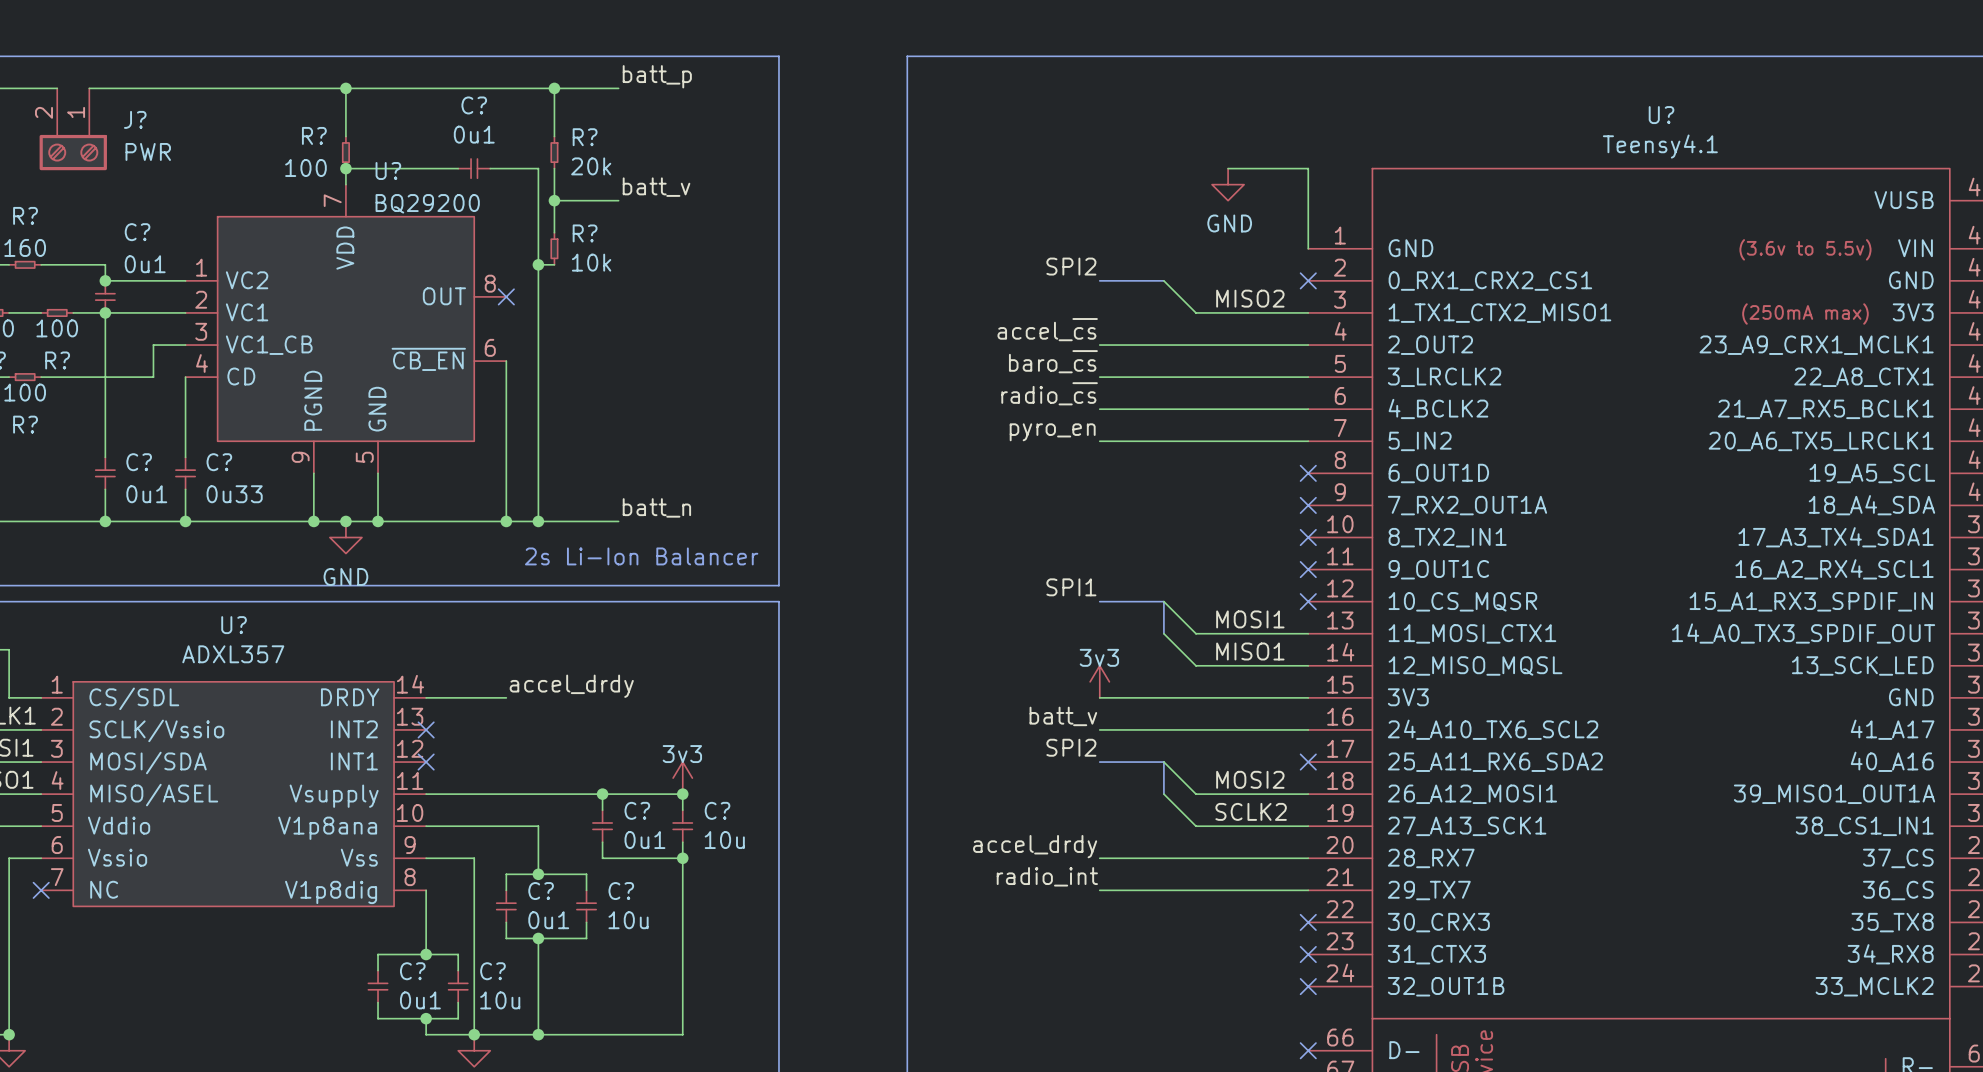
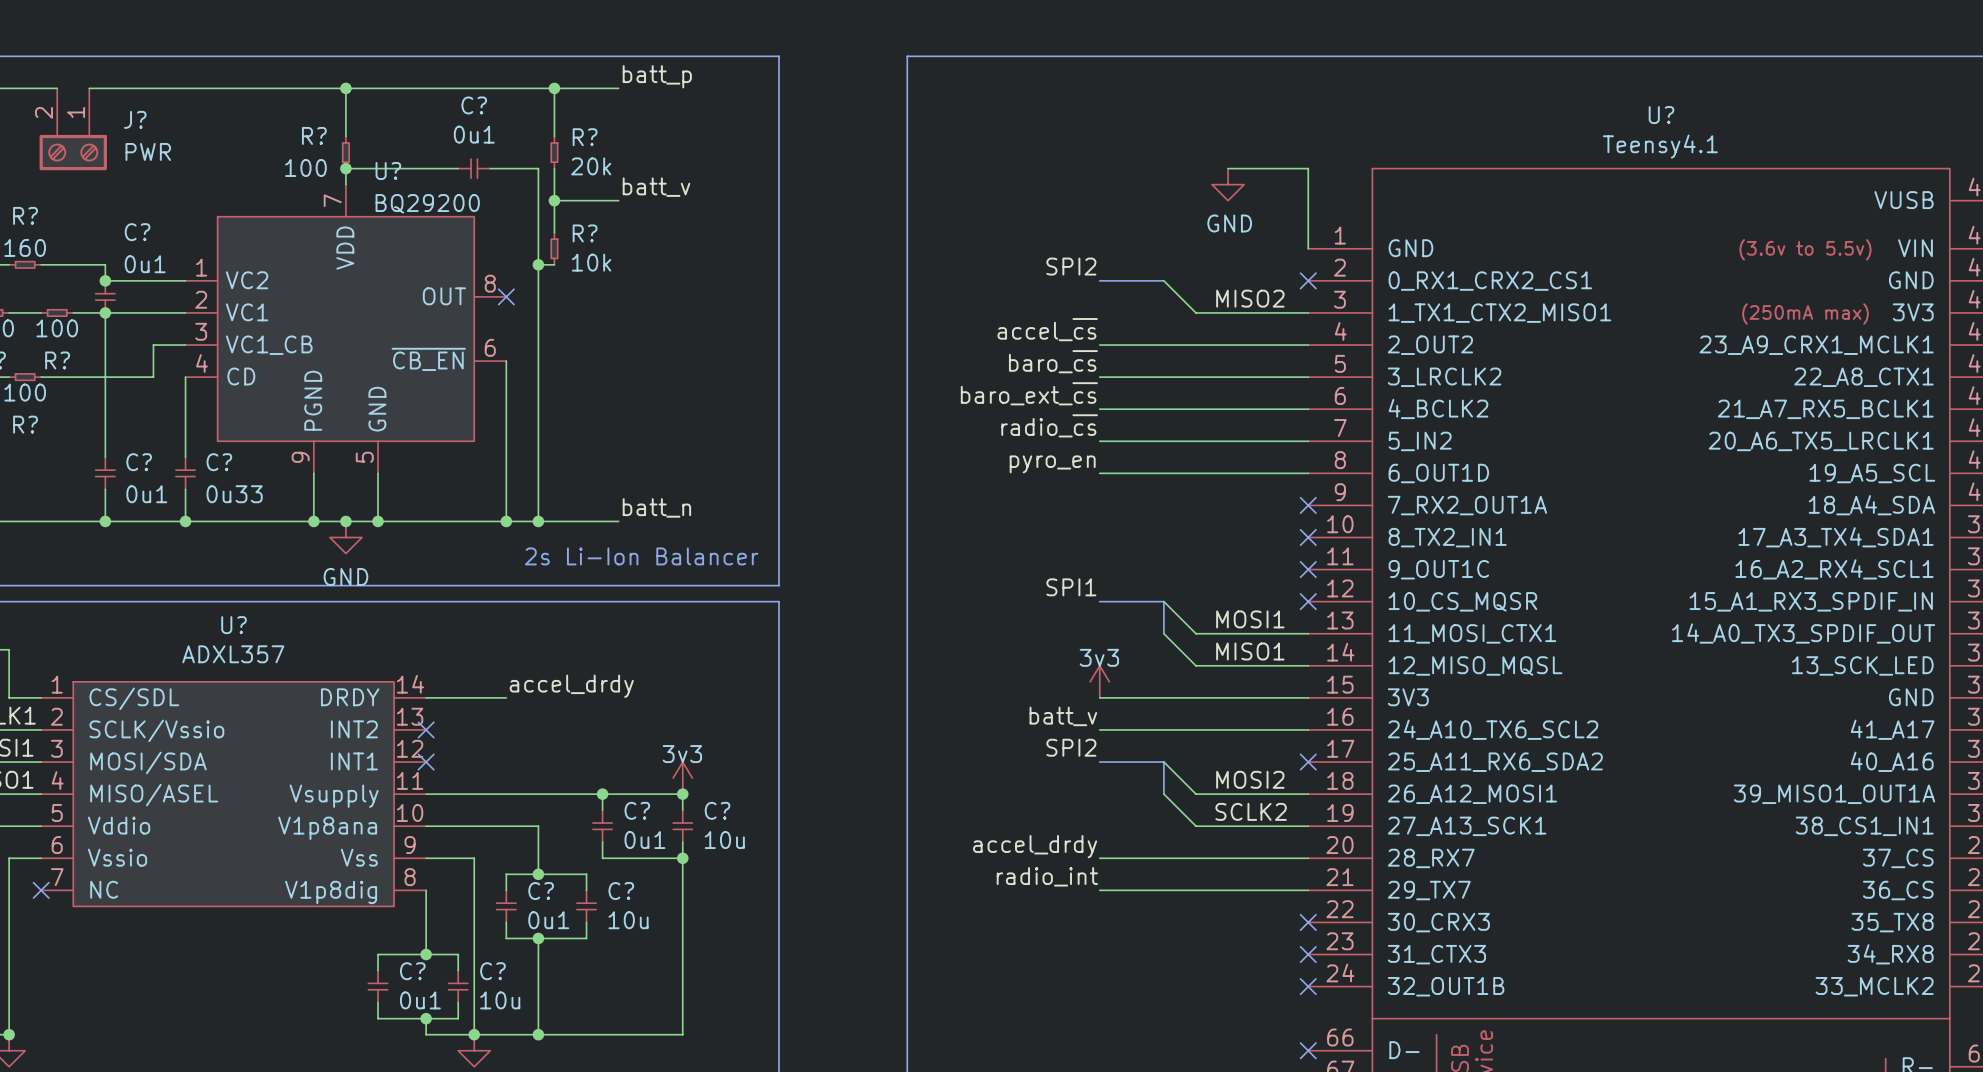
label: radio_~{cs} (1049, 393) -> baro_ext_~{cs} (1029, 393)
label: pyro_en (1052, 432) -> radio_~{cs} (1049, 425)
label: none -> pyro_en (1052, 464)
wire: none -> (1099, 473) (1308, 473)
no-connect mark: (1308, 473) -> none

